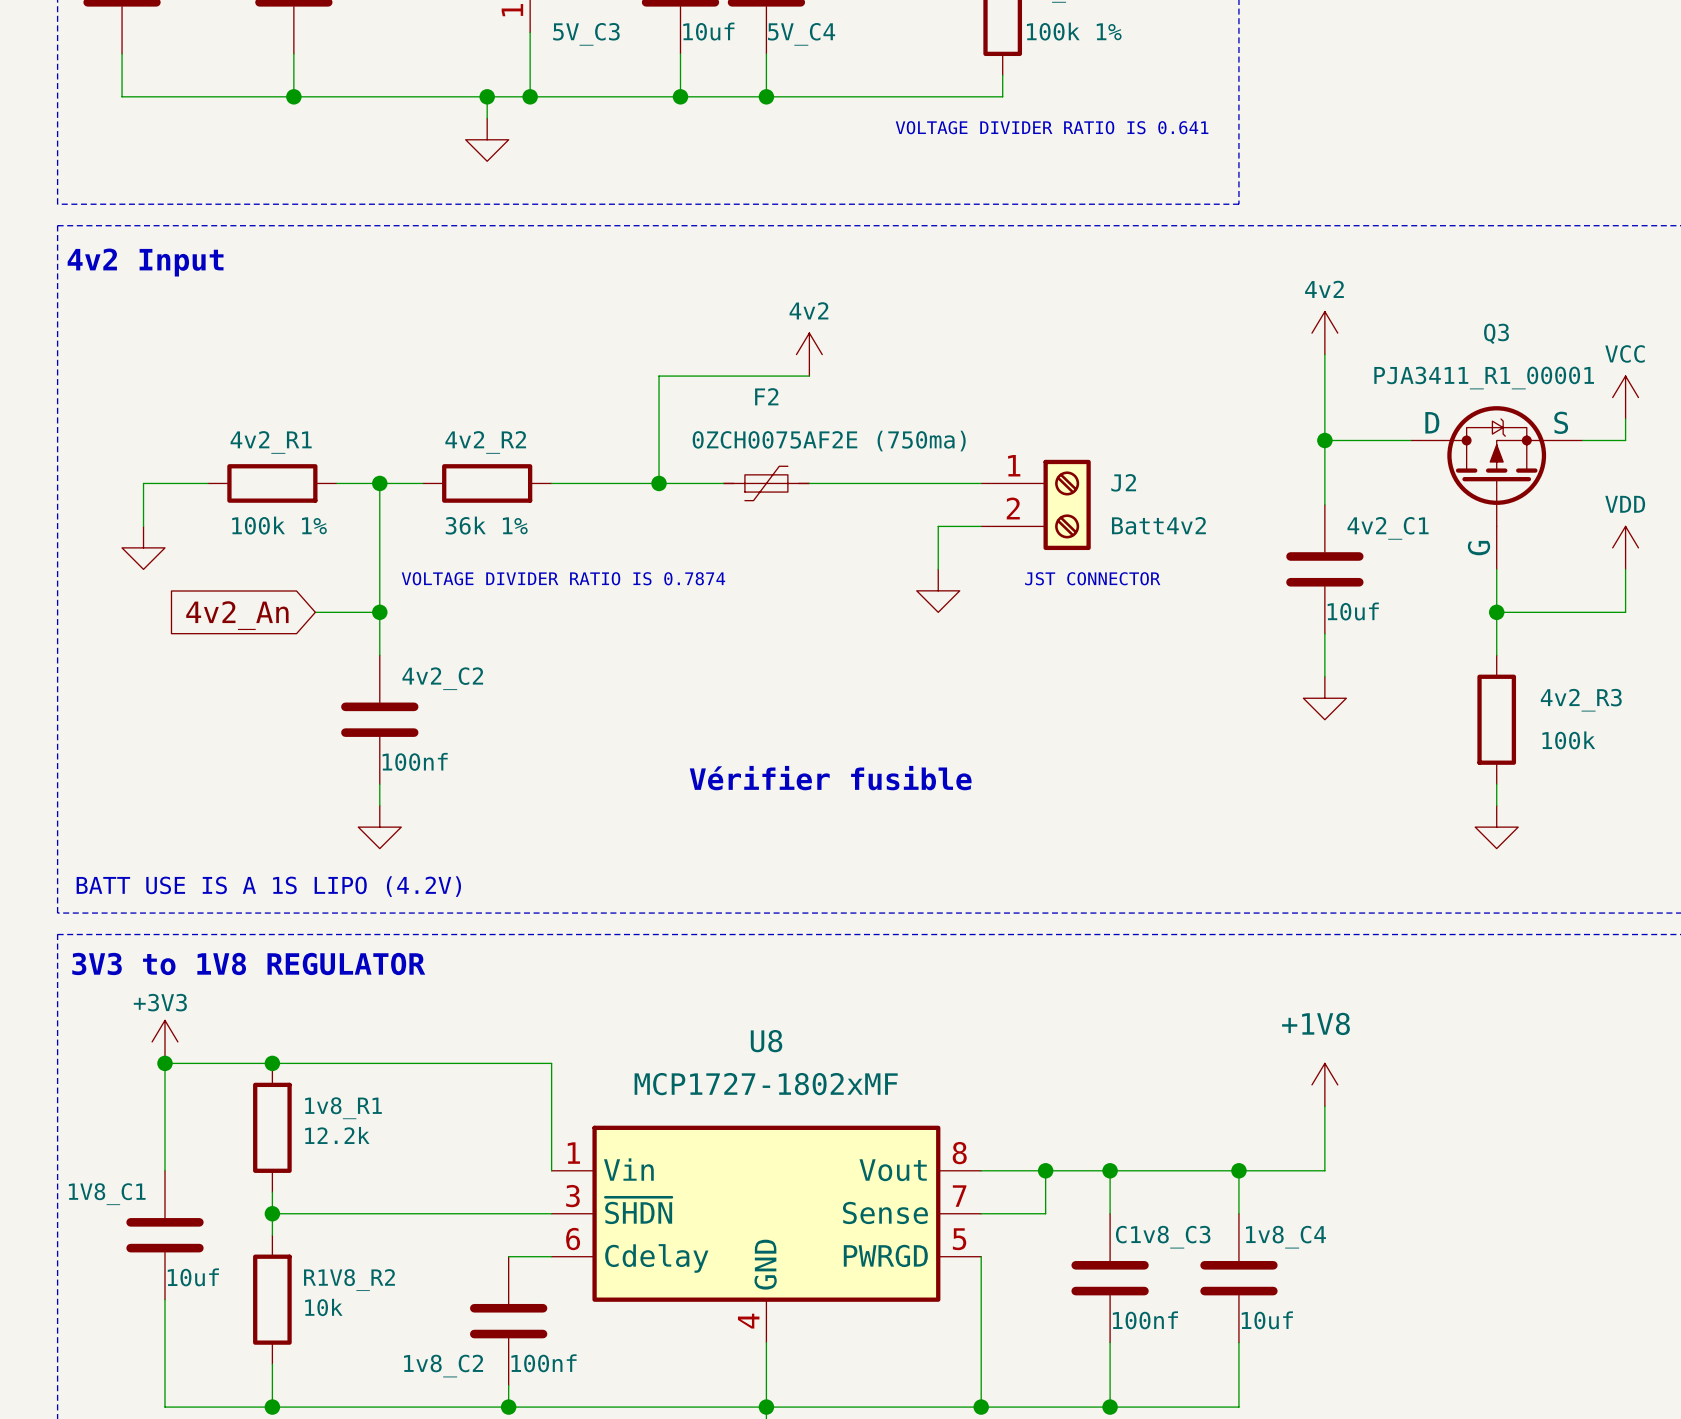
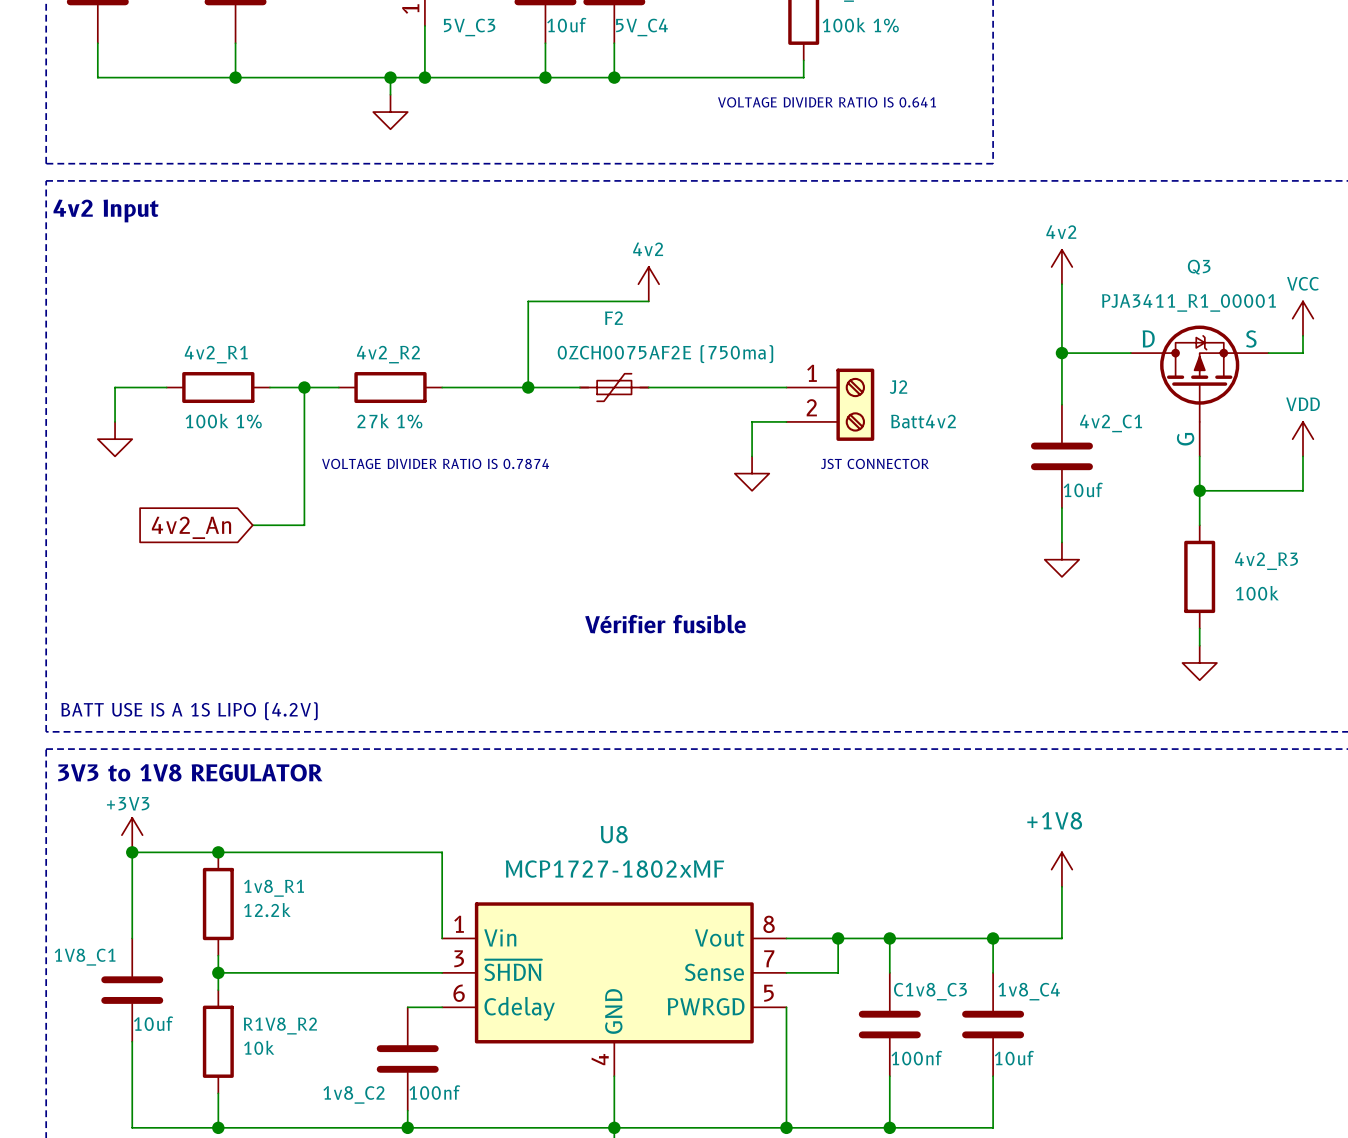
4v2_R2 value: 36k 1% (486, 525) -> 27k 1% (389, 421)
wire: (315, 612) (379, 612) -> (252, 525) (304, 525)
junction: (379, 612) -> none
global label position: 4v2_An (237, 615) -> 4v2_An (191, 527)
4v2_C2: 100nf (379, 719) -> none
wire: (379, 784) (379, 805) -> none
power symbol: (379, 827) -> none

